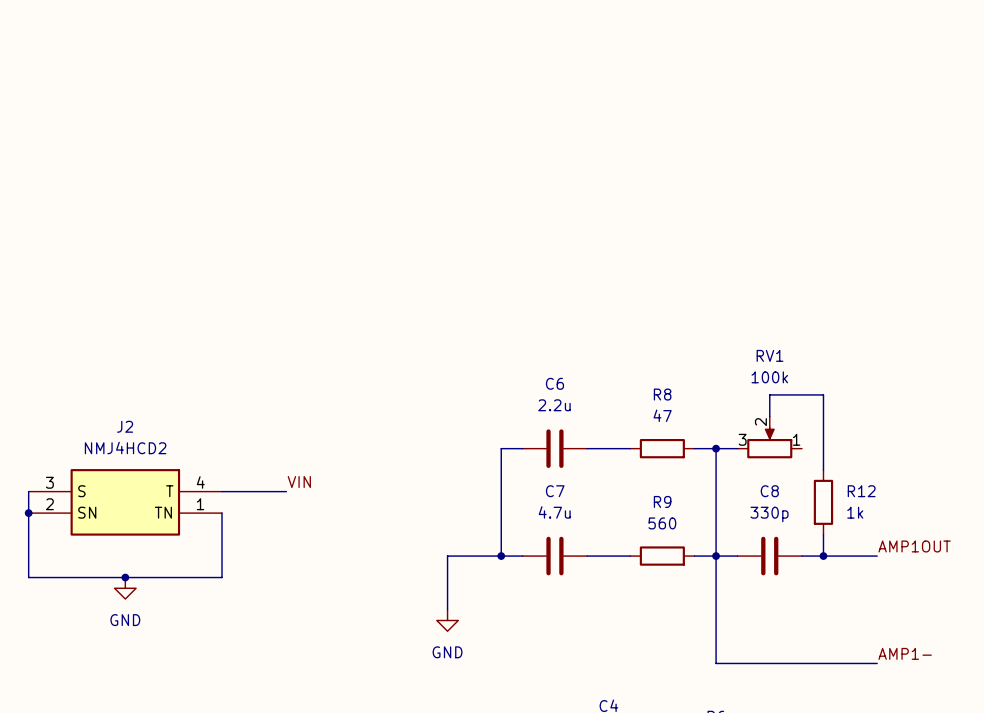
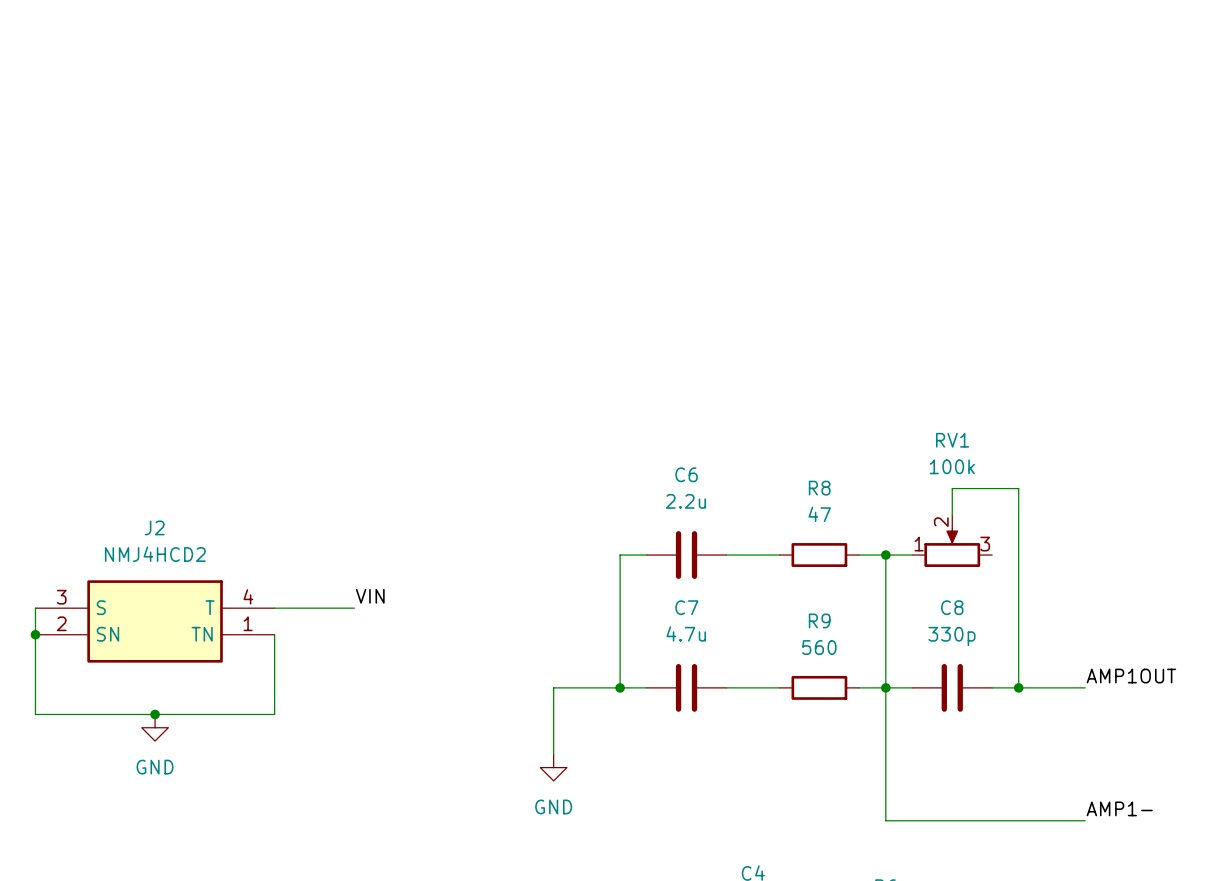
RV1 flip: as is (769, 442) -> left-right (952, 547)
wire: none -> (1018, 581) (1018, 661)
R12: 1k (823, 502) -> none

